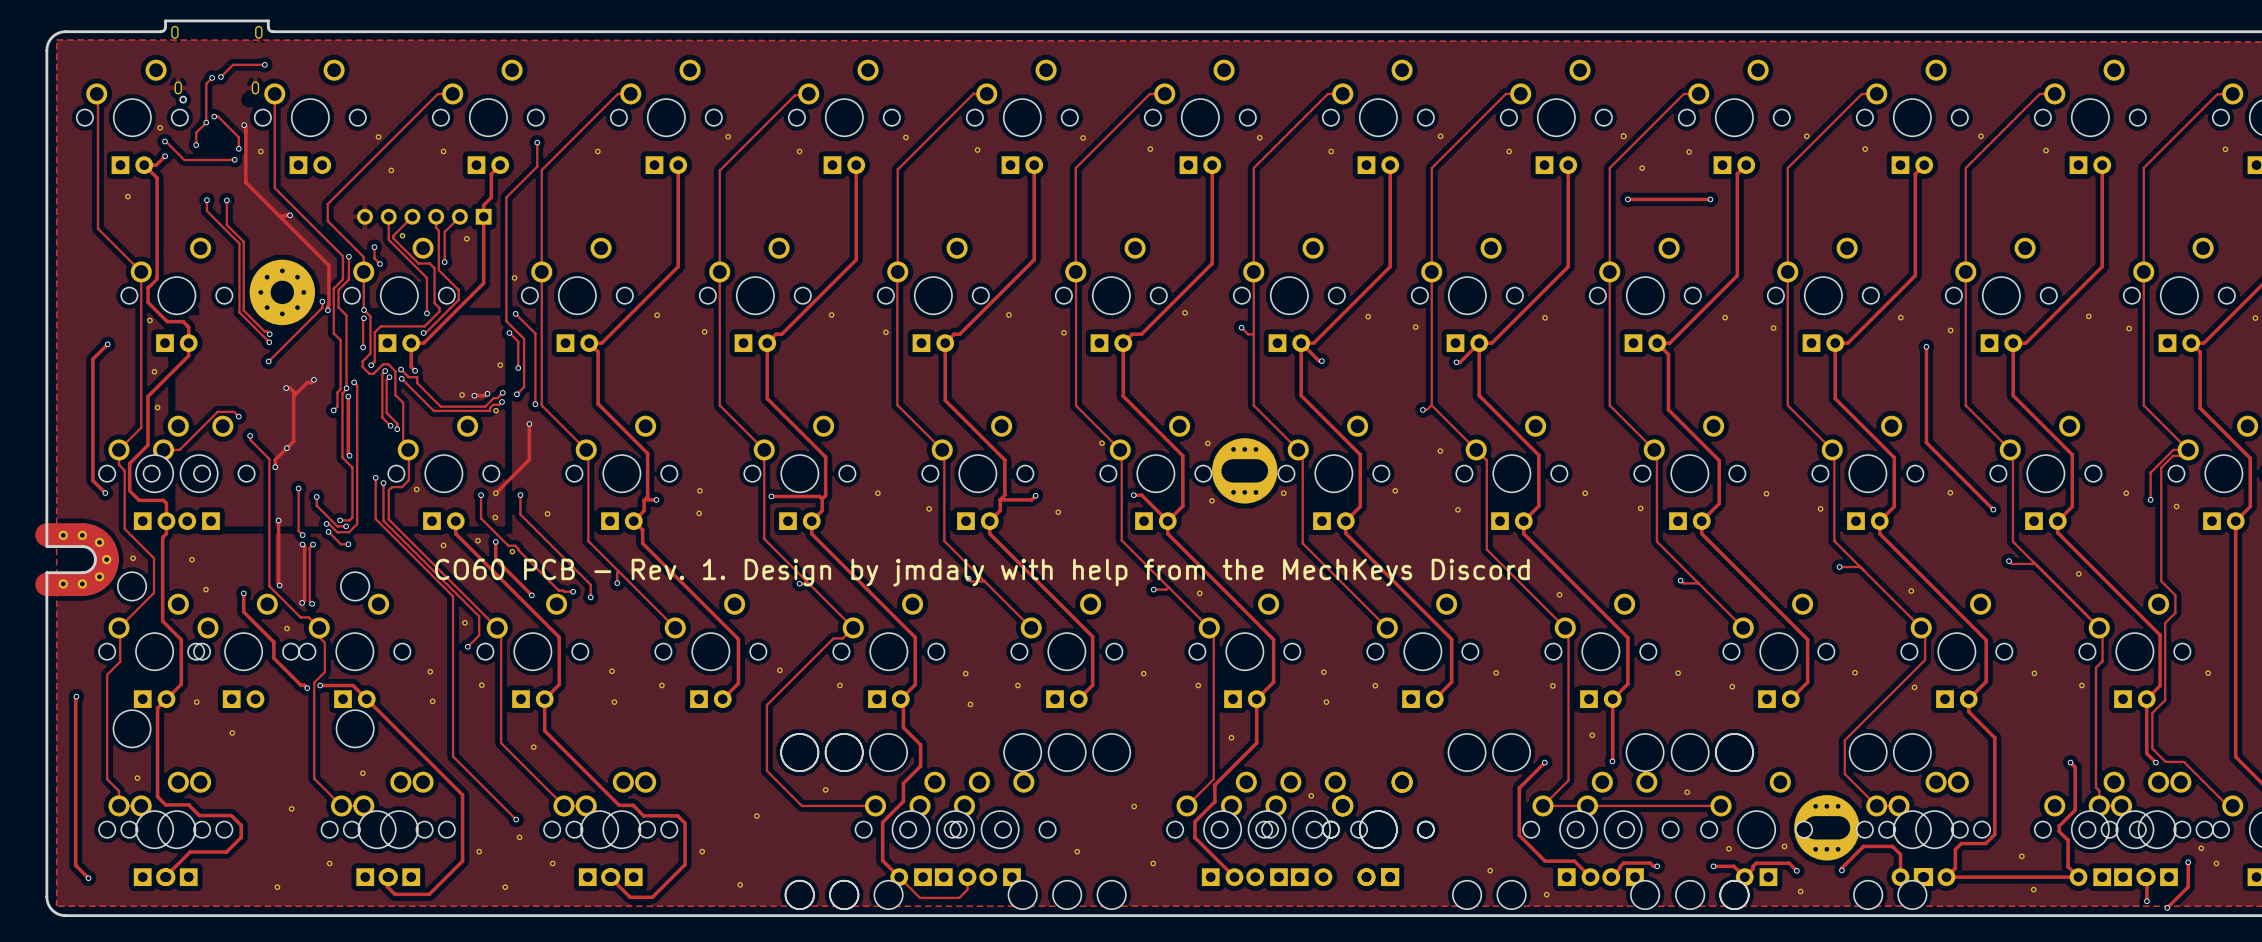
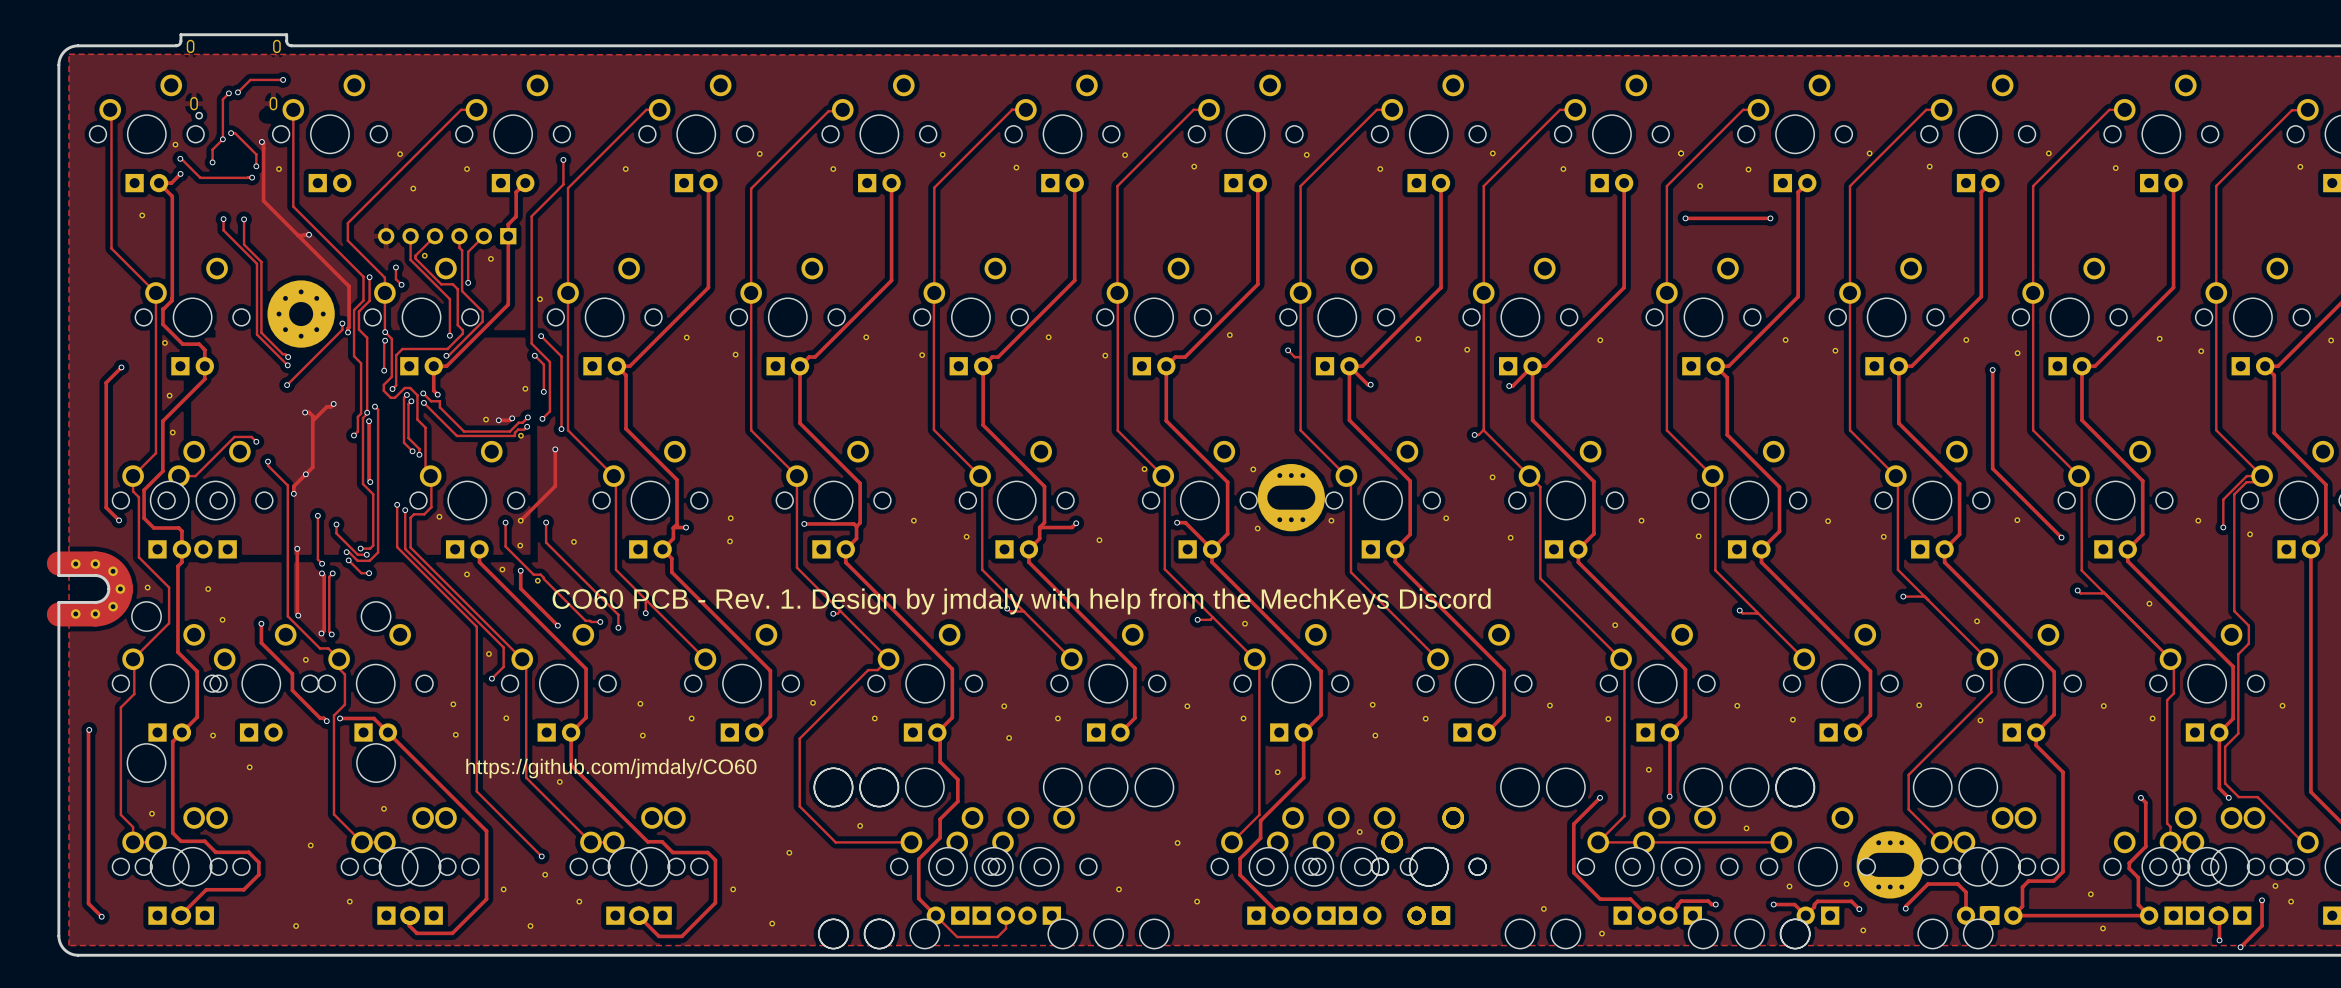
text: none -> https://github.com/jmdaly/CO60 (611, 768)

